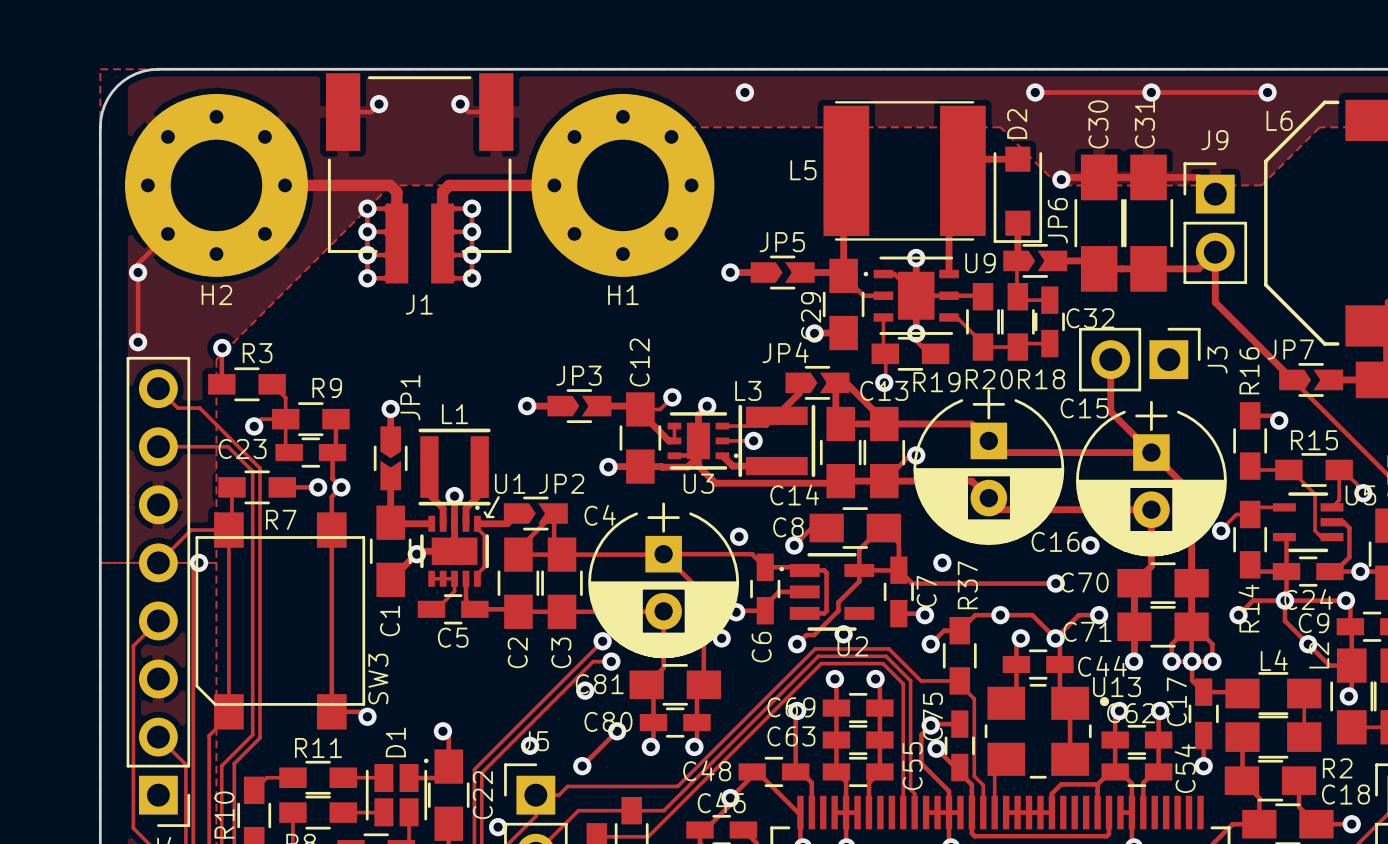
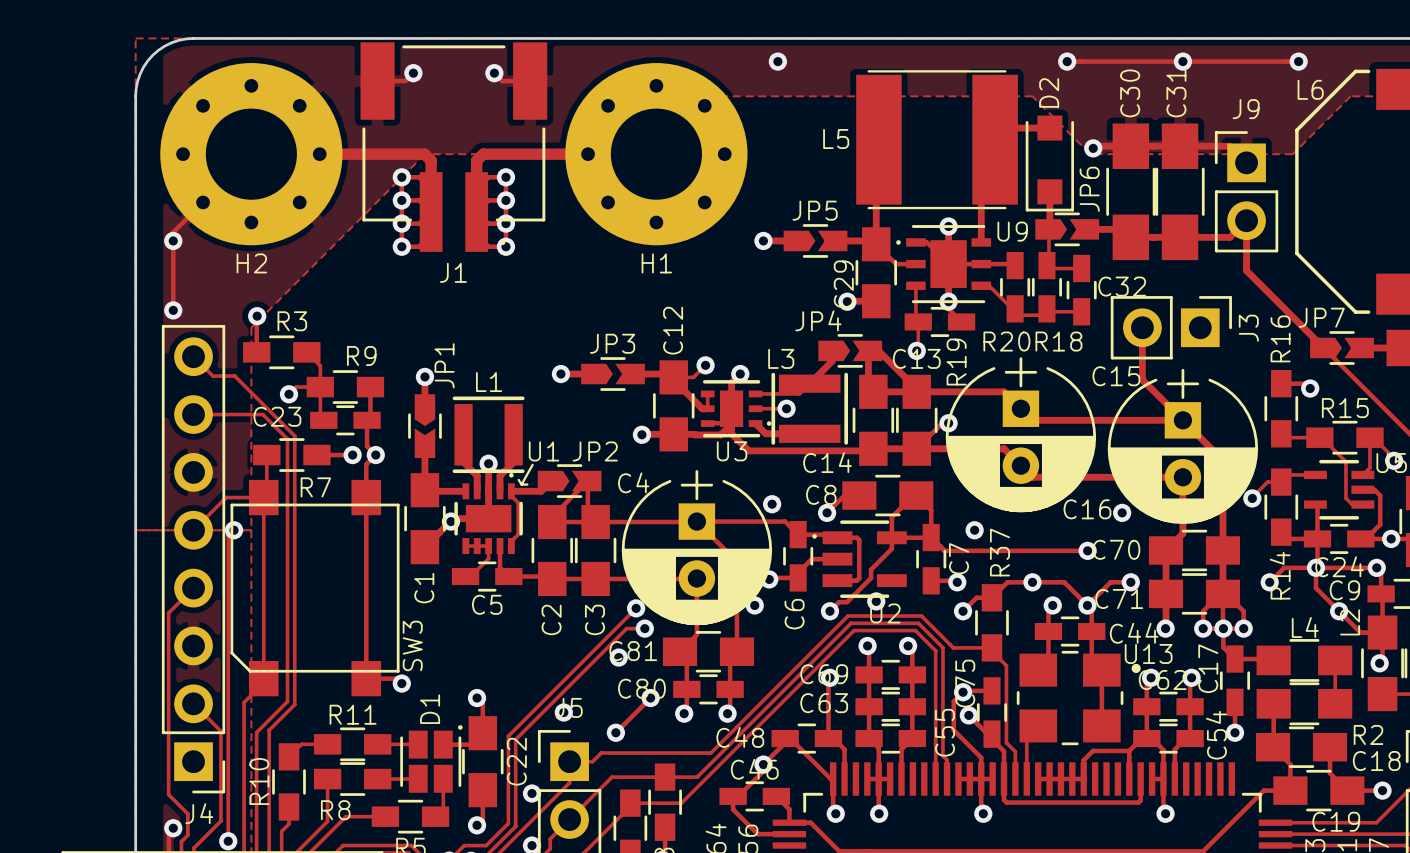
R20 footprint: [966, 283, 1000, 361] -> [1000, 251, 1031, 323]
R18 footprint: [1000, 283, 1035, 361] -> [1031, 251, 1062, 323]
R19 footprint: [871, 336, 950, 371] -> [904, 306, 976, 337]
R20 name position: R20 (989, 379) -> R20 (1006, 341)
R18 name position: R18 (1041, 379) -> R18 (1058, 341)
R19 name rotation: 0° (936, 382) -> 90° counterclockwise (956, 362)

